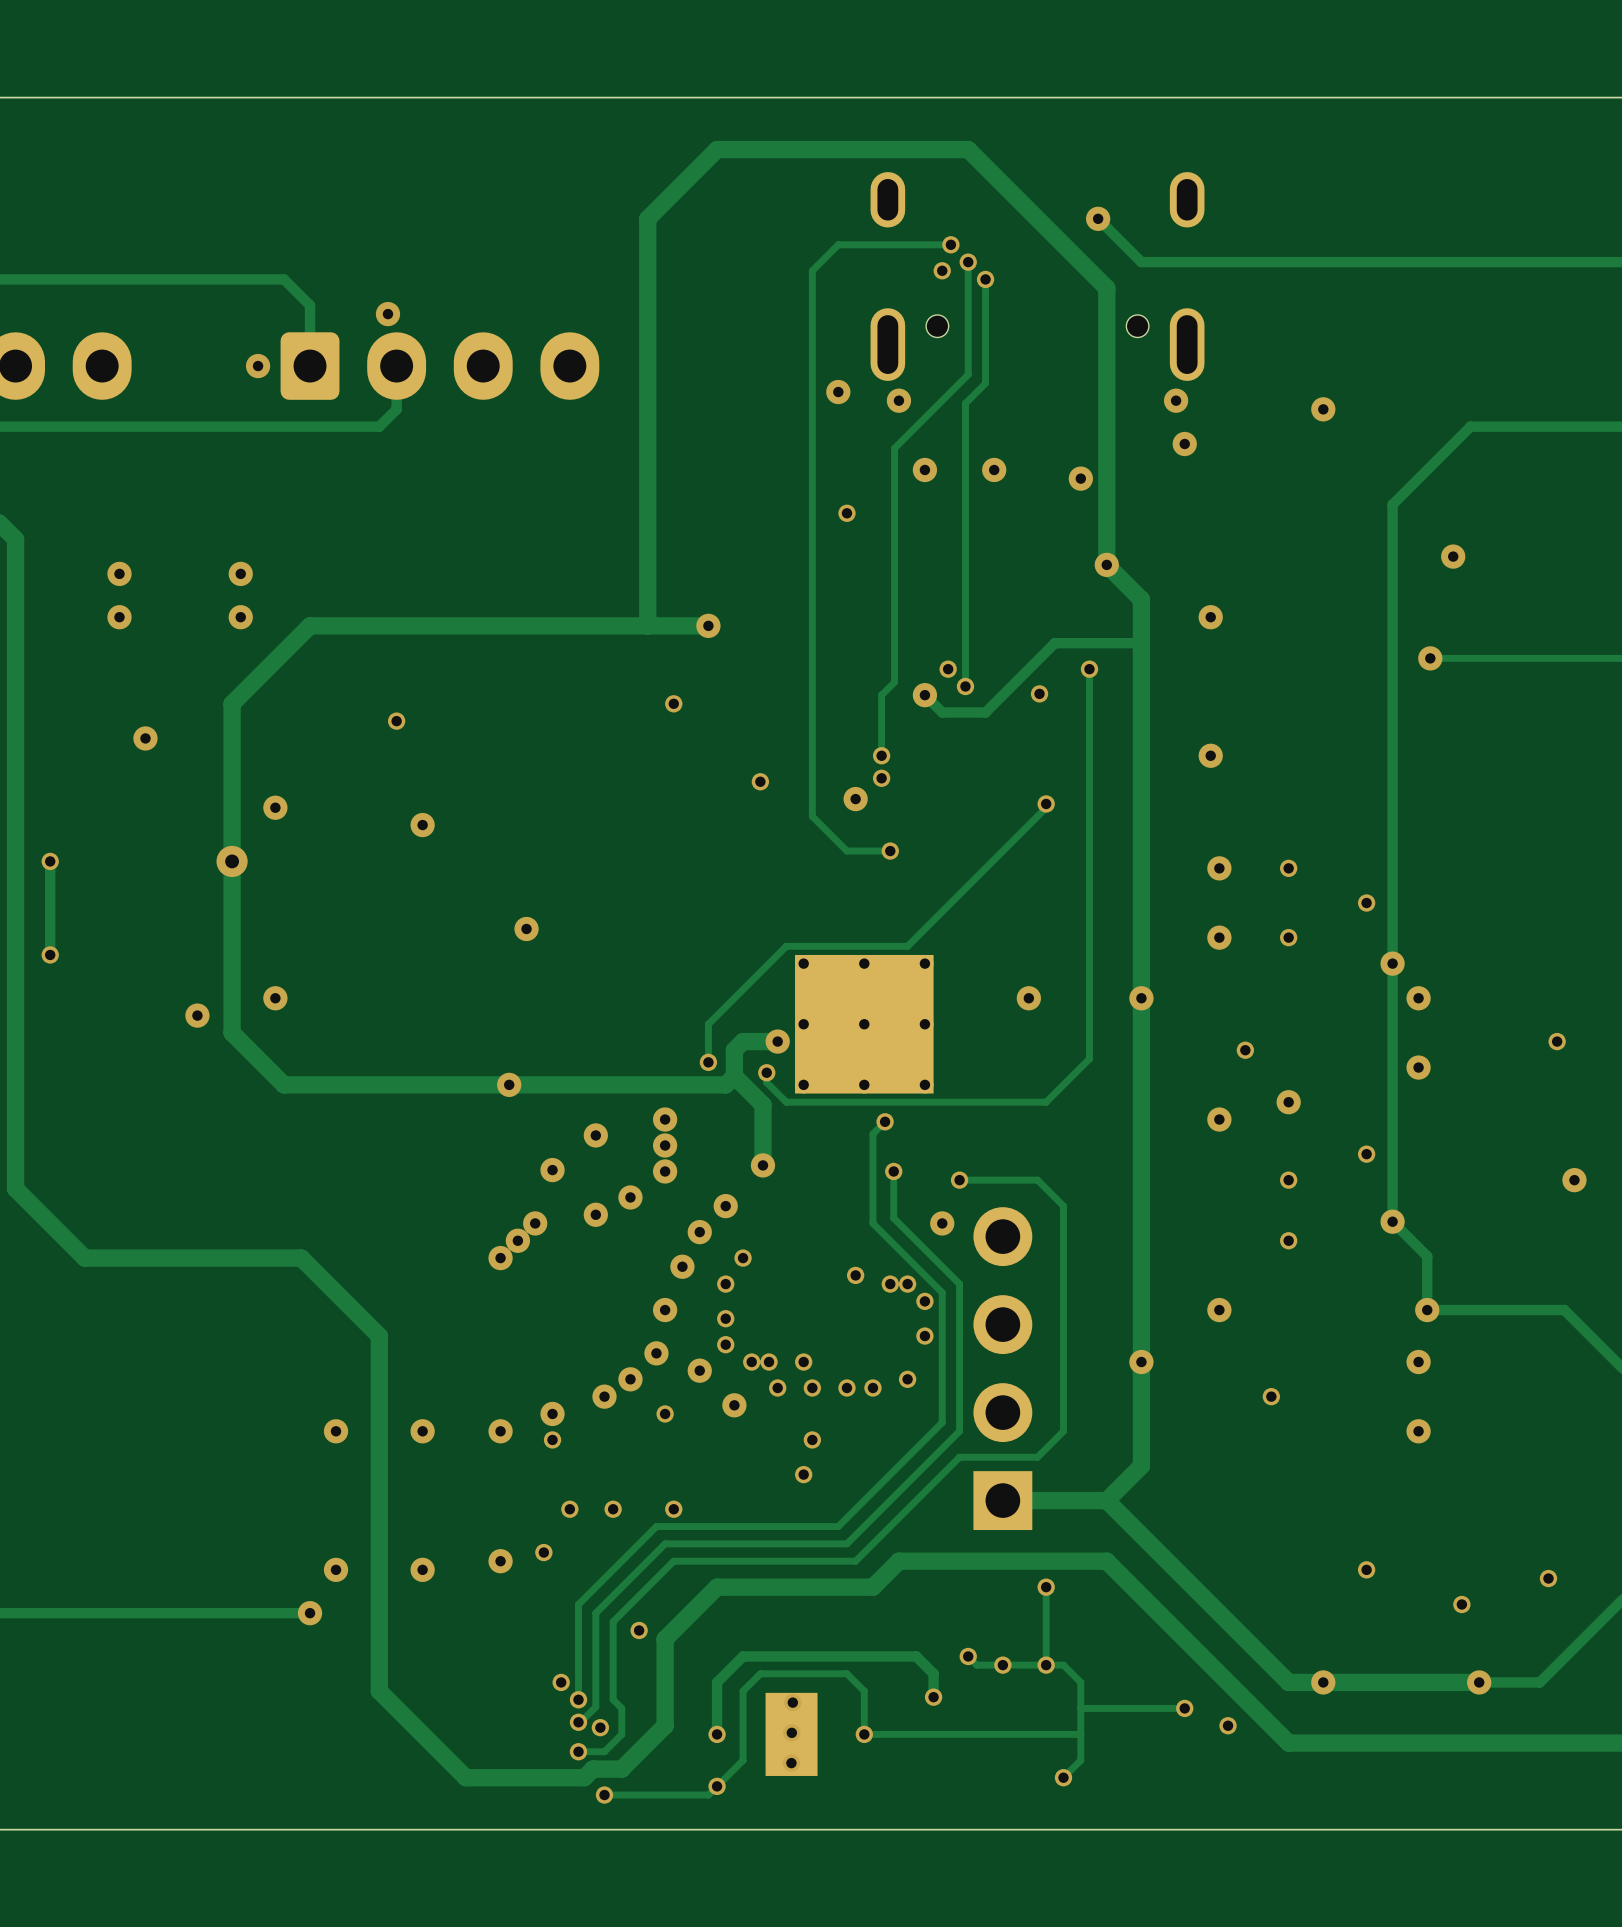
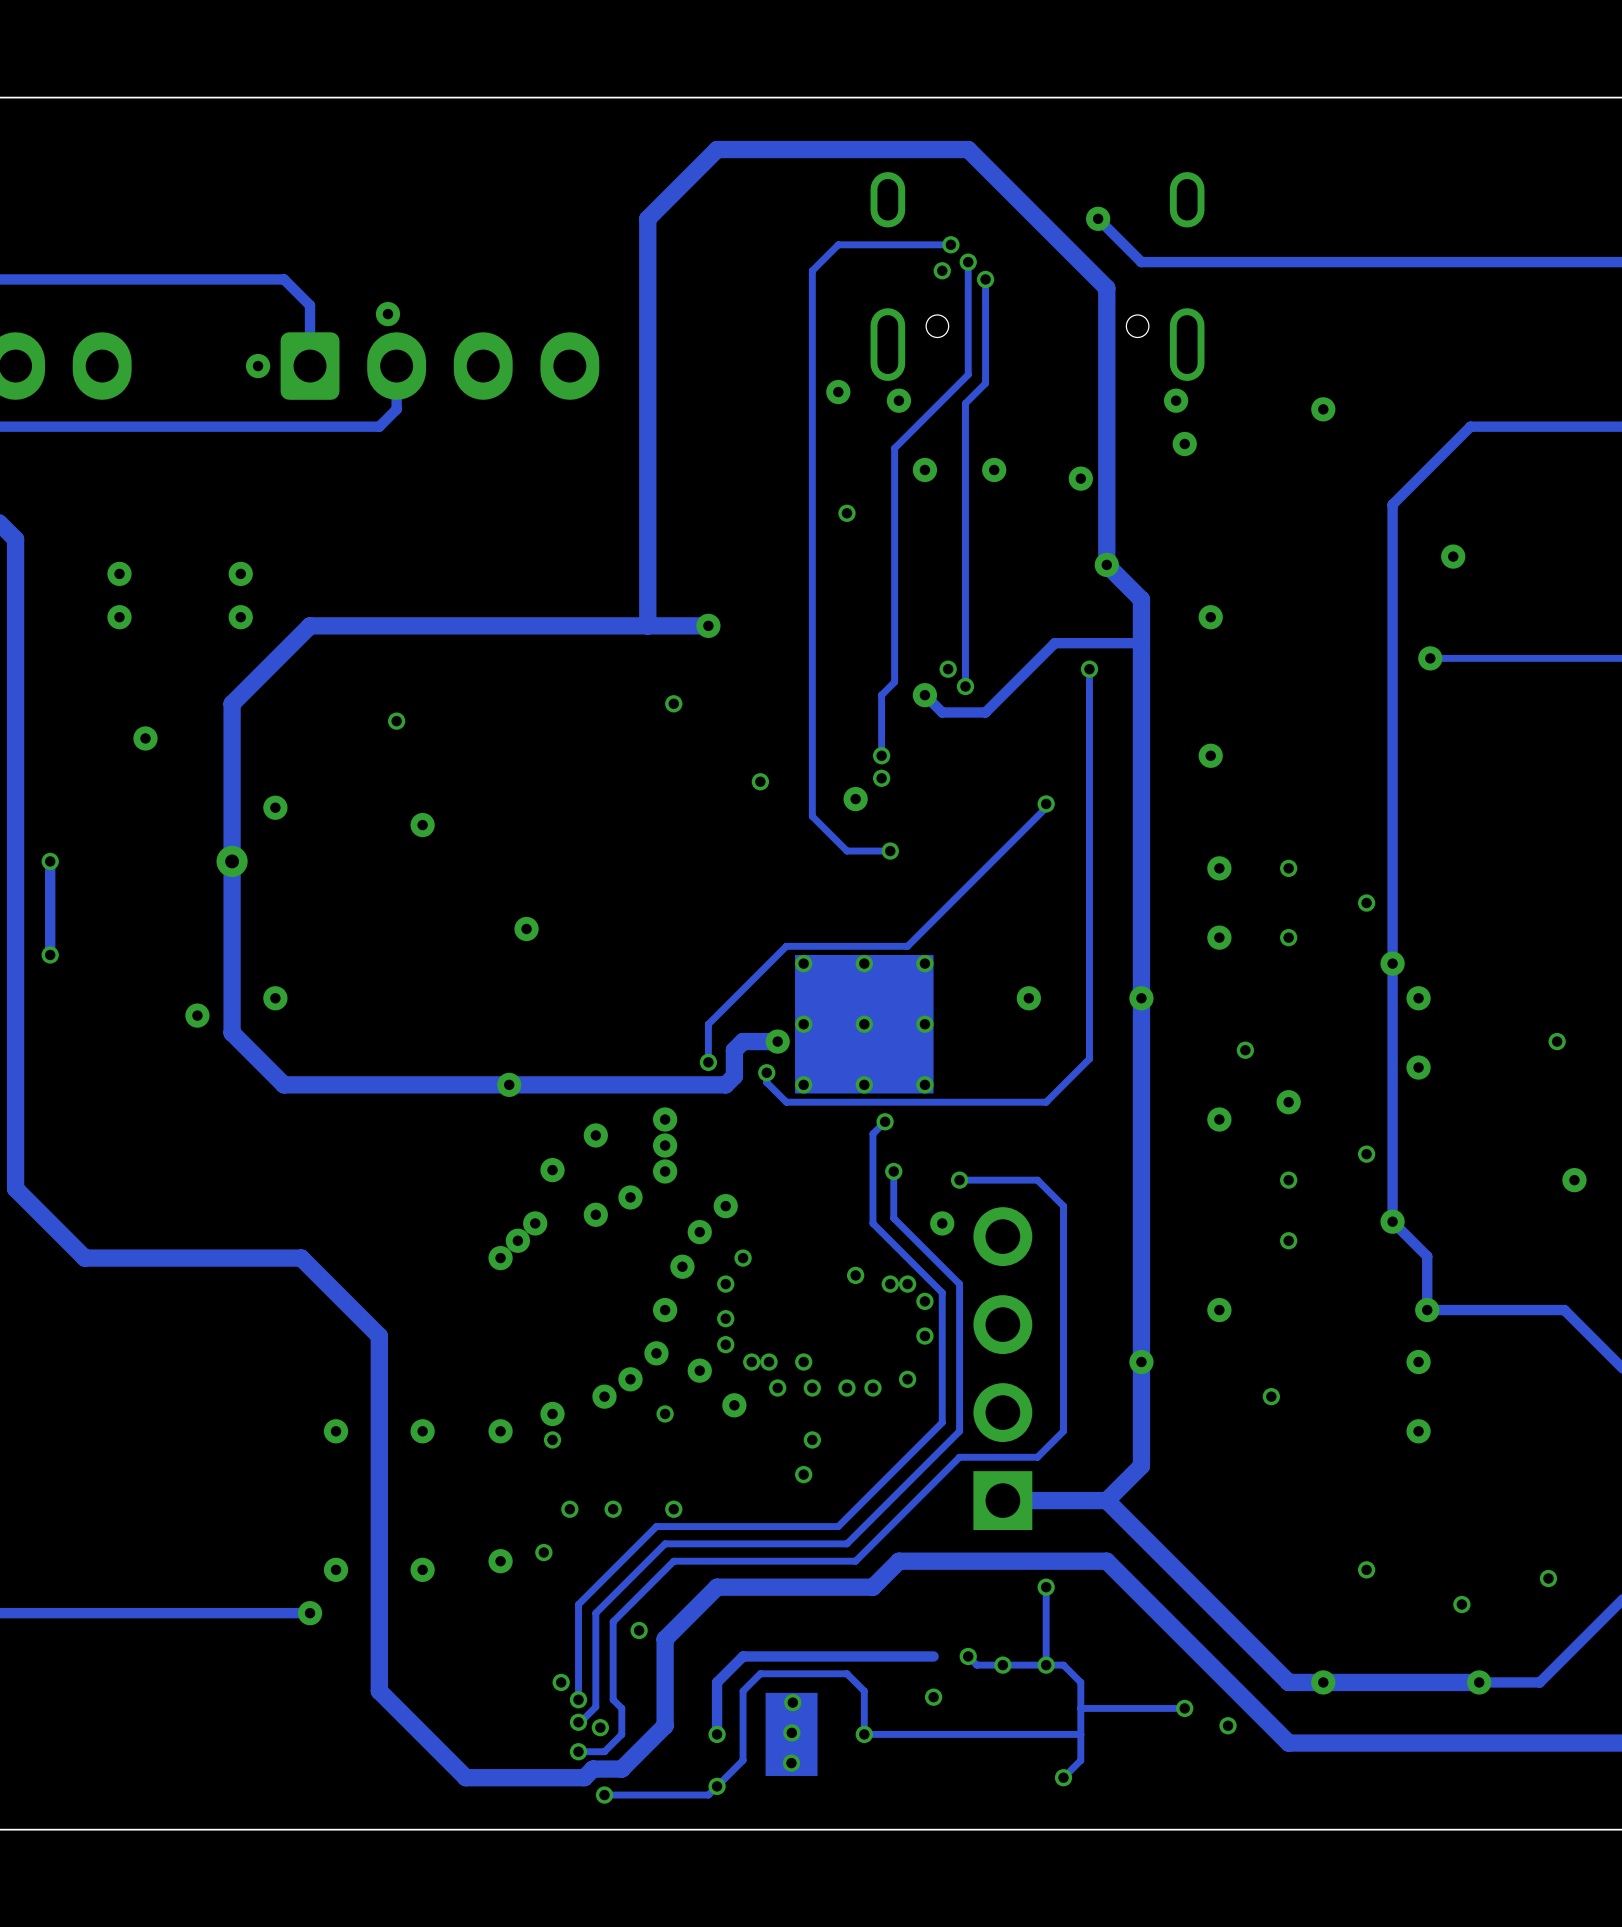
via: (1039, 693) -> none
track: (734, 1076) (762, 1104) (762, 1165) -> none
via: (762, 1165) -> none
track: (916, 1656) (933, 1673) (933, 1697) -> (916, 1656) (933, 1656)

